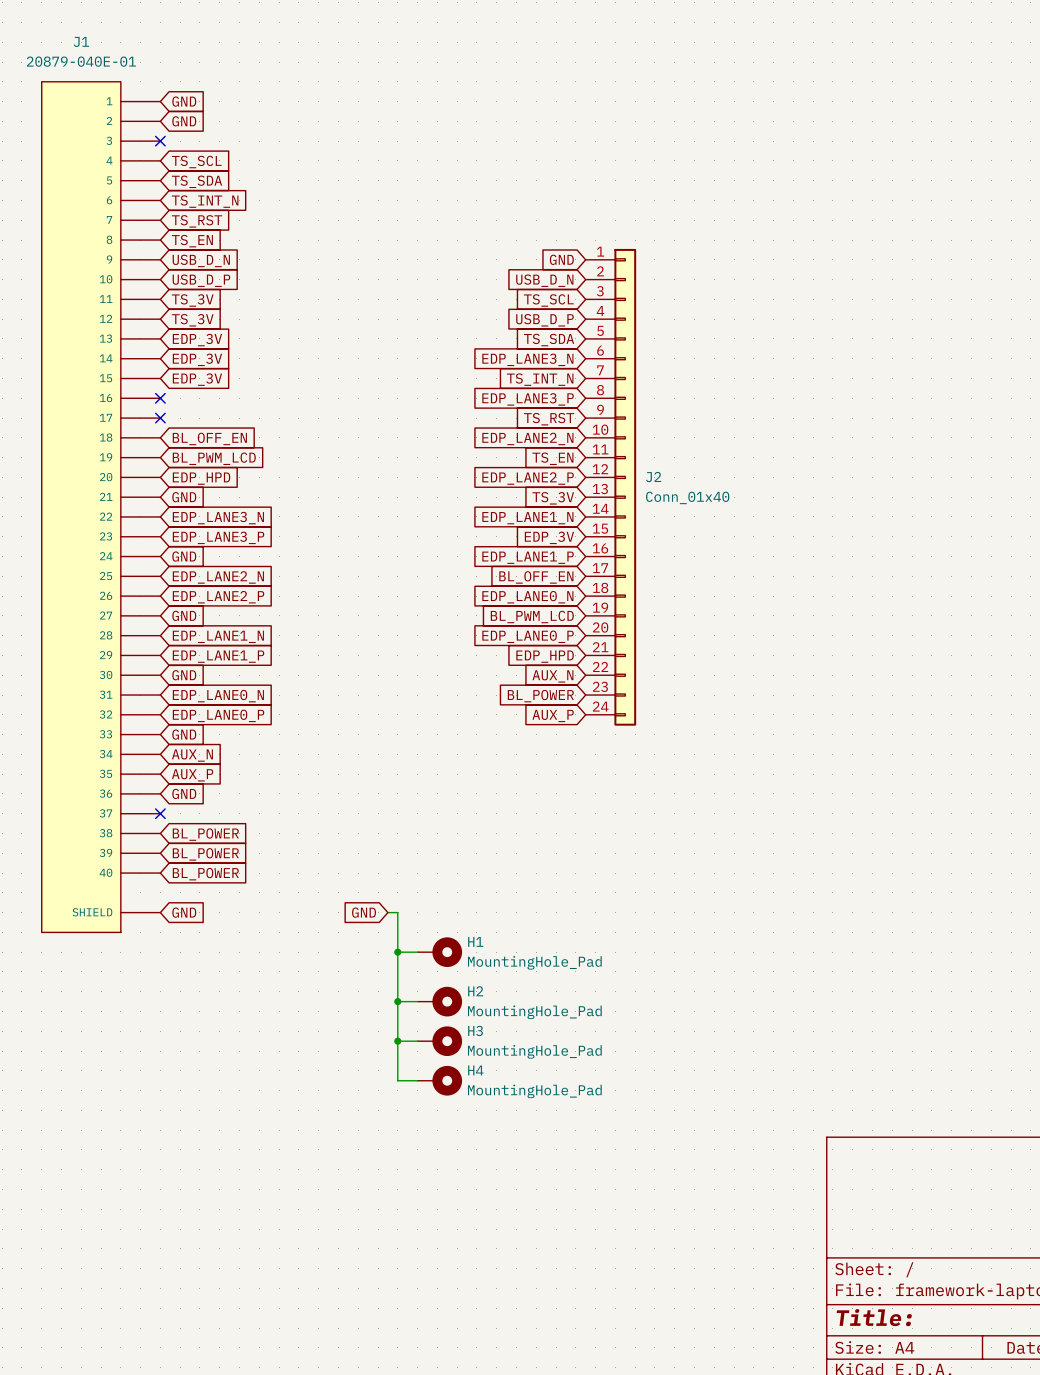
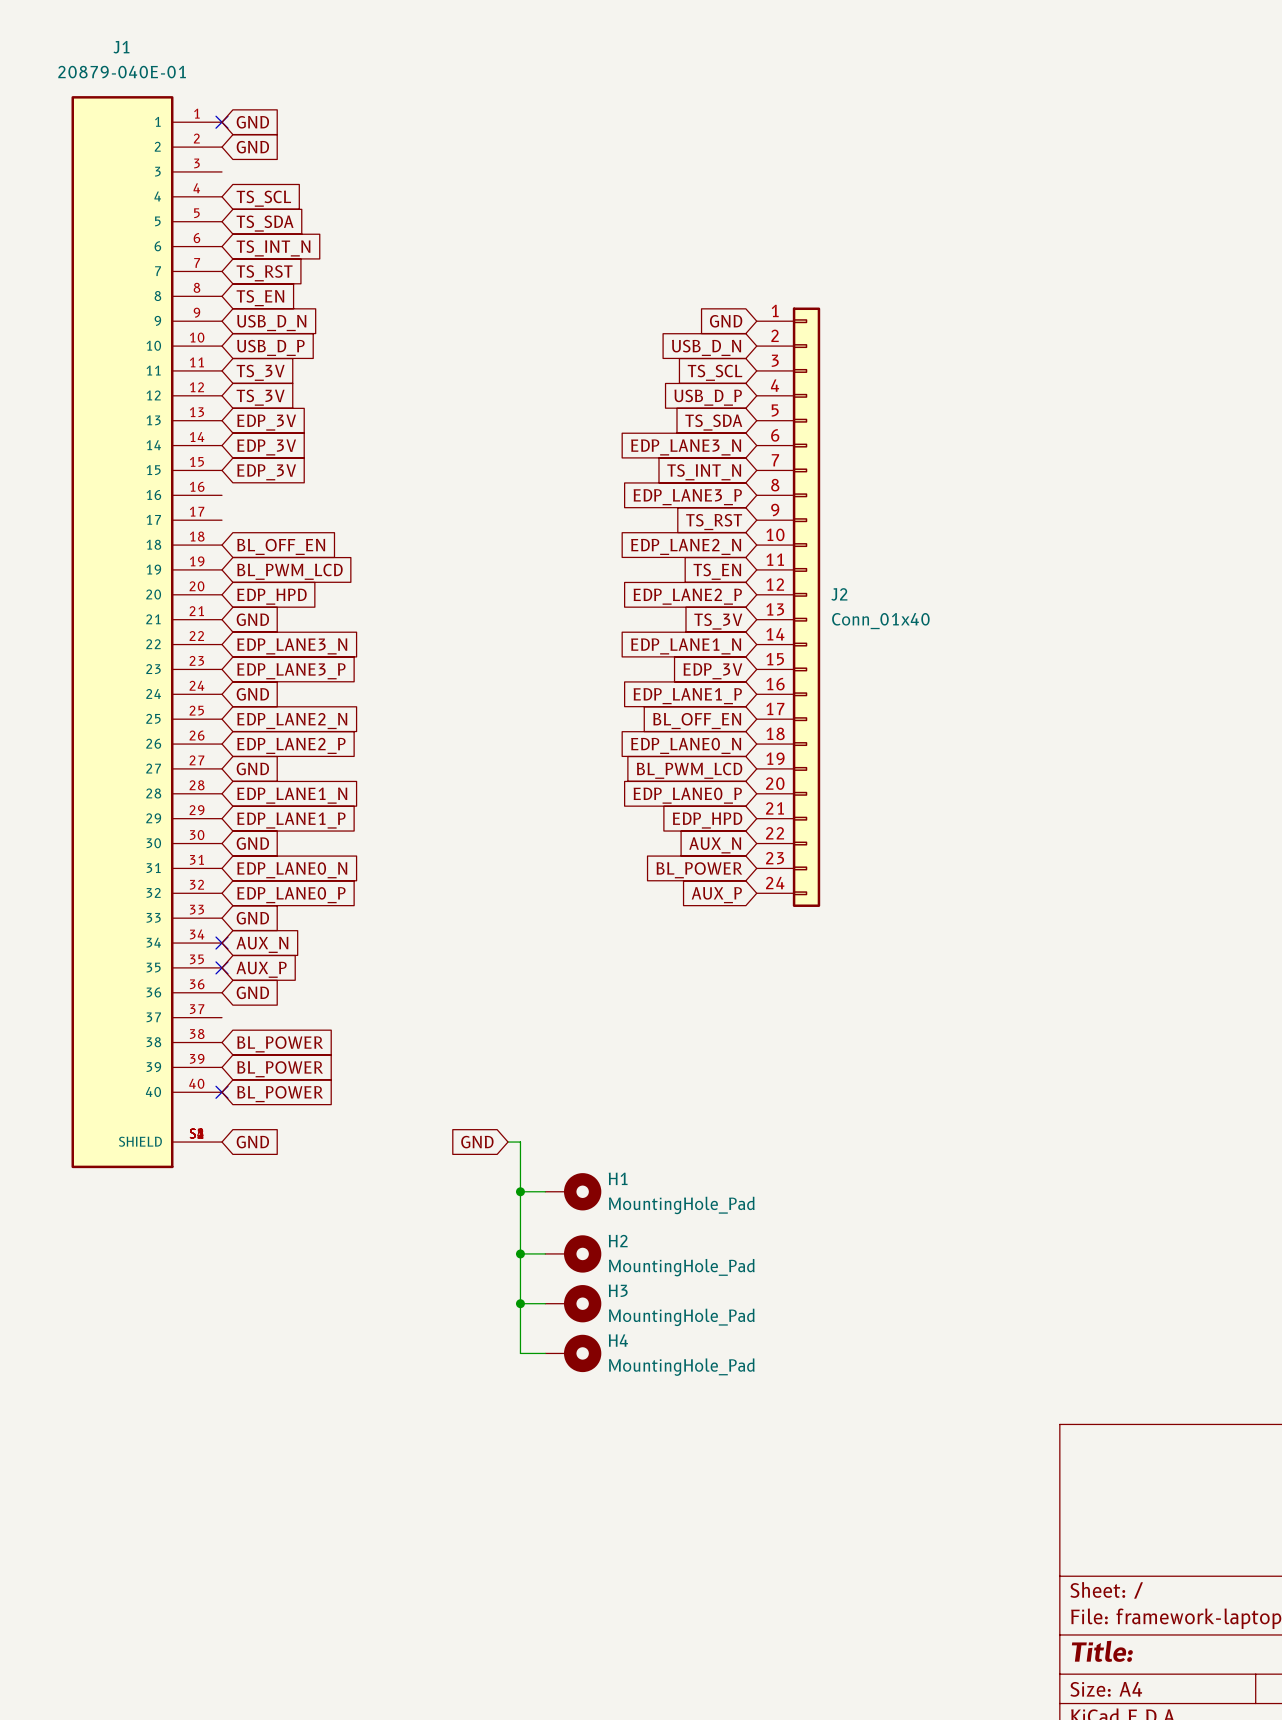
J1 symbol: [41, 81, 161, 933] -> [71, 96, 222, 1169]
no-connect mark position: (160, 141) -> (221, 122)
no-connect mark: (160, 398) -> none
no-connect mark: (160, 418) -> none
no-connect mark: none -> (221, 943)
no-connect mark: none -> (221, 967)
no-connect mark: (160, 813) -> none
no-connect mark: none -> (221, 1092)

